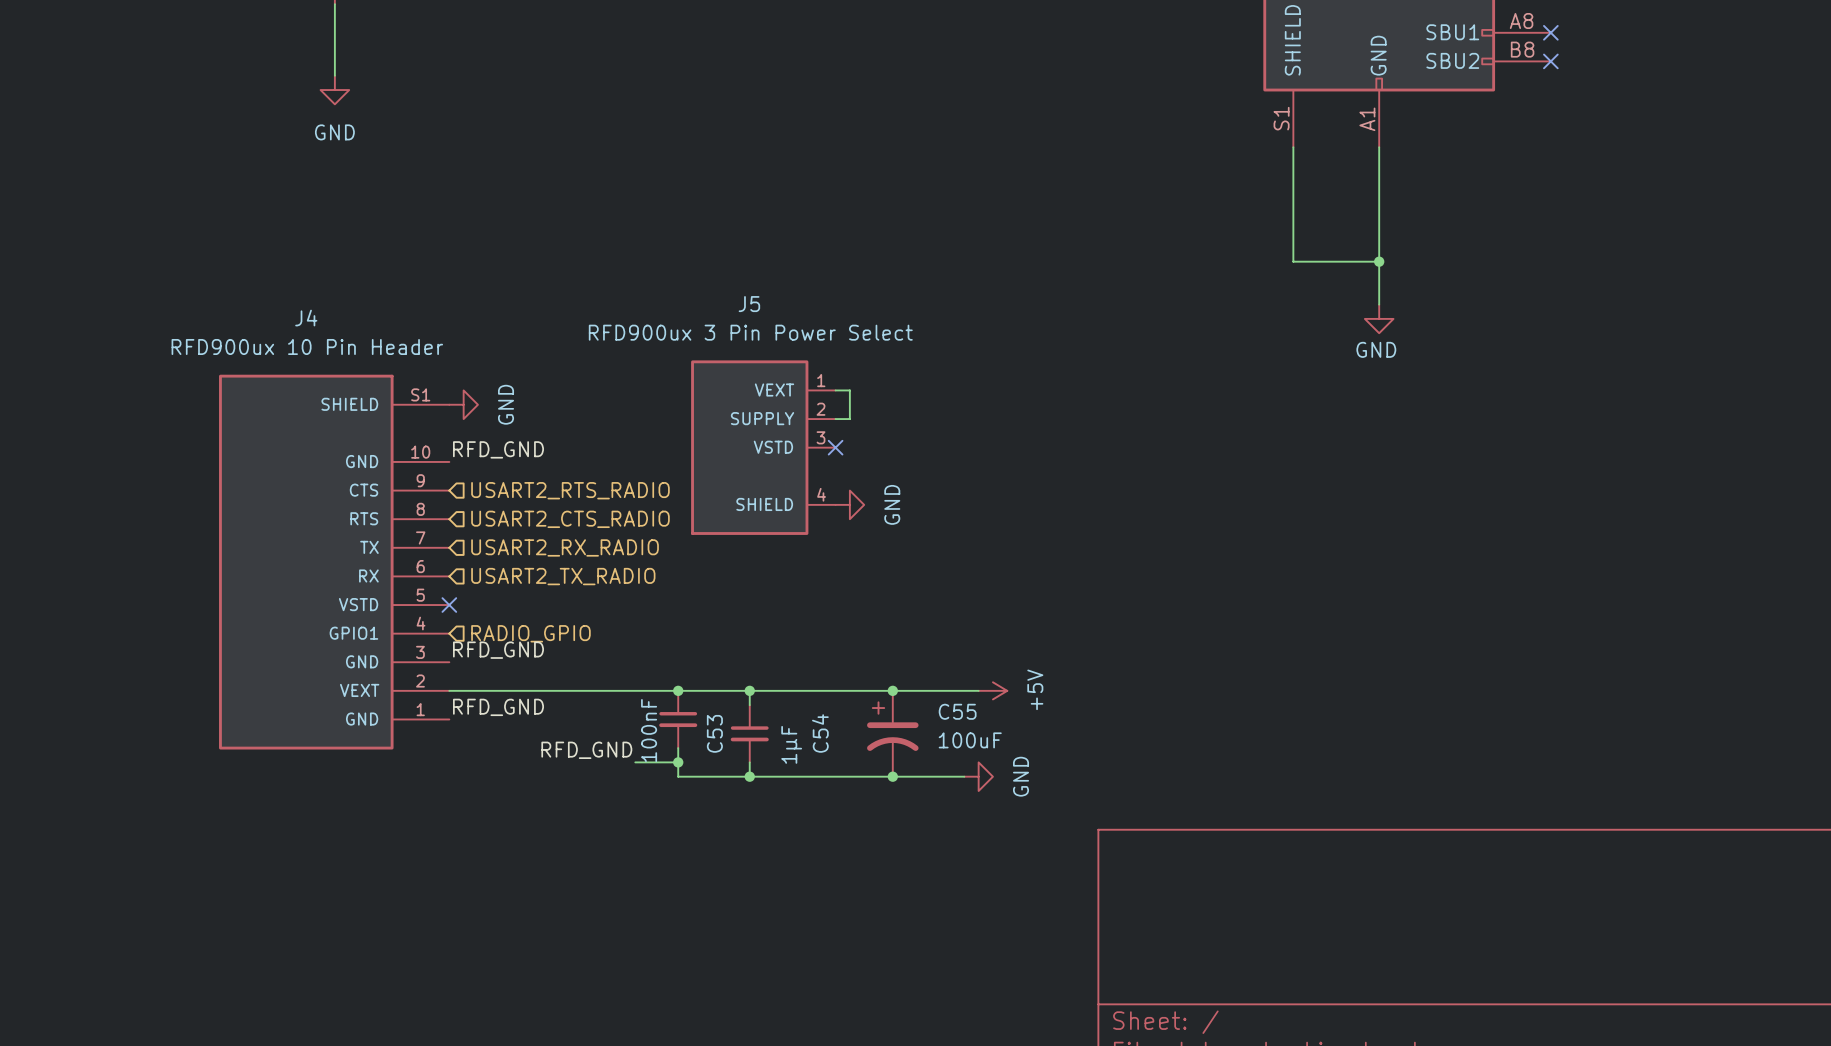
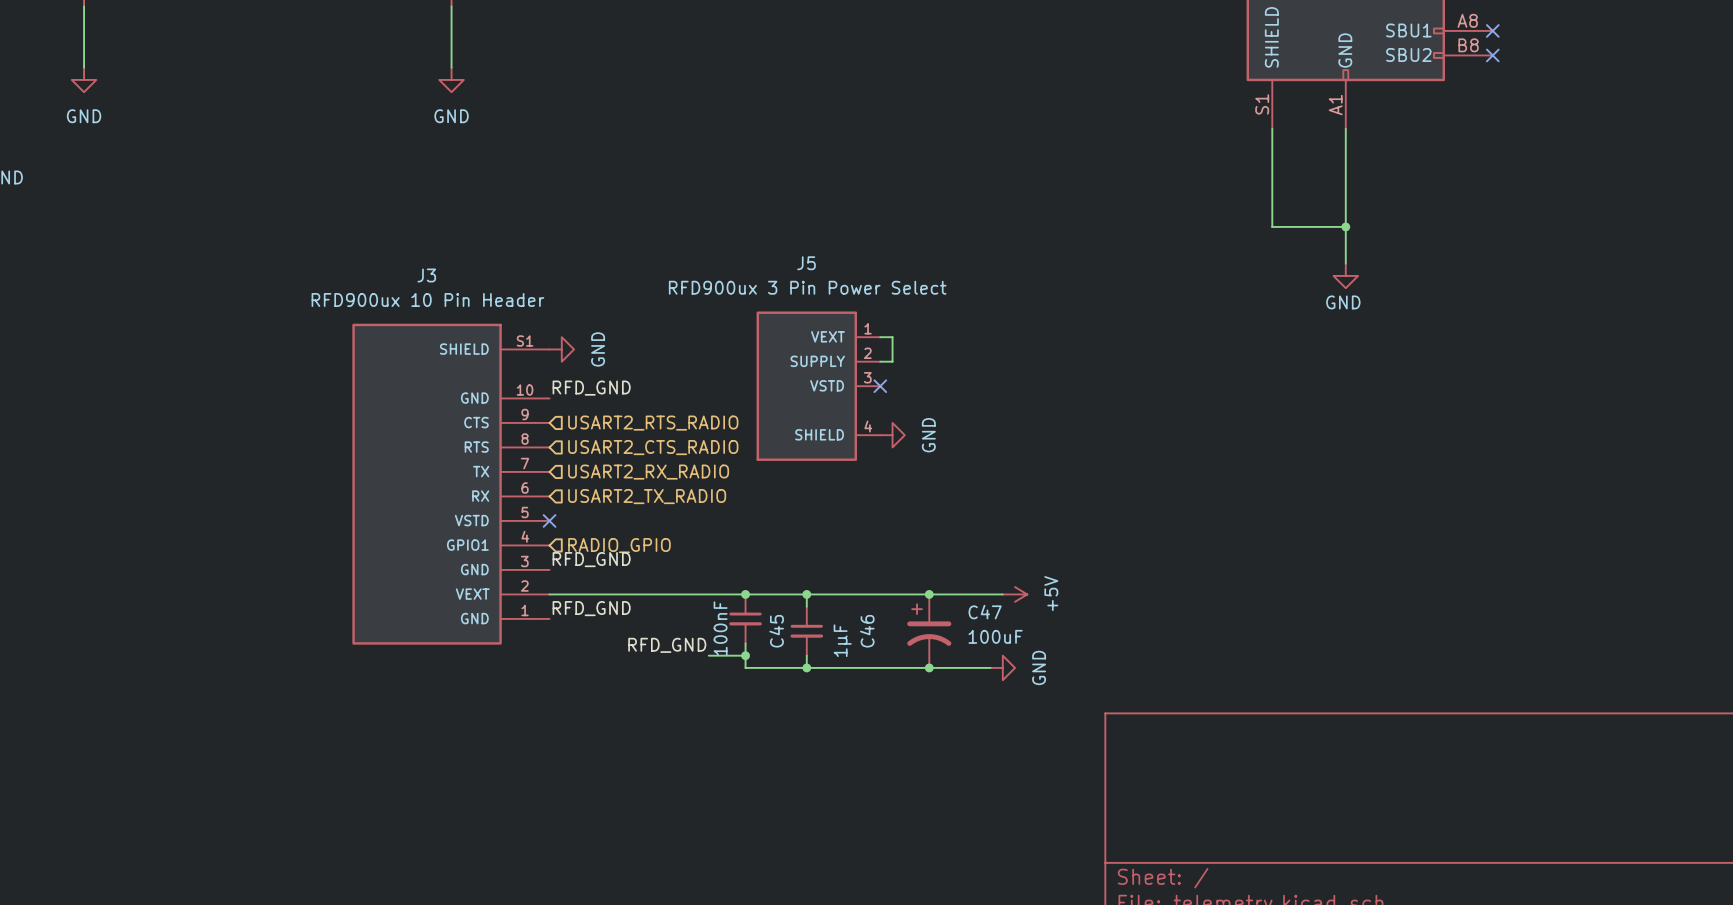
J4 name: J4 (306, 318) -> J3 (426, 275)
C55 name: C55 (957, 711) -> C47 (985, 612)
C53 name: C53 (714, 733) -> C45 (776, 631)
C54 name: C54 (820, 733) -> C46 (867, 631)

